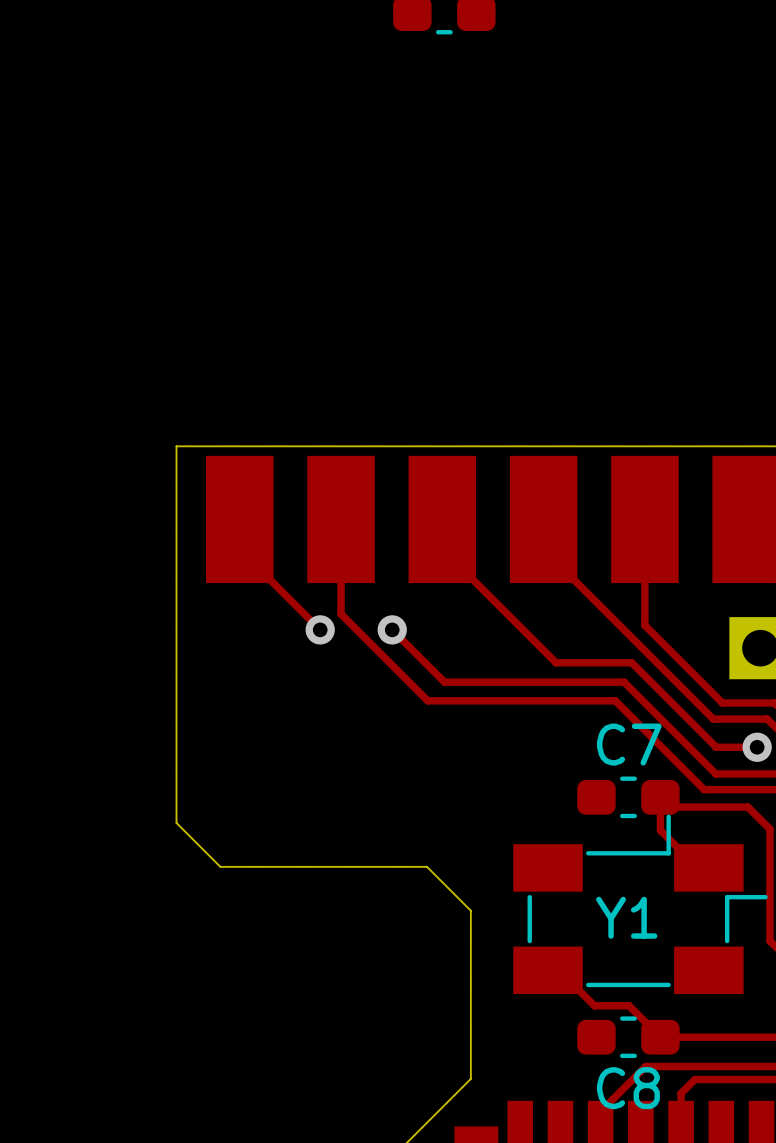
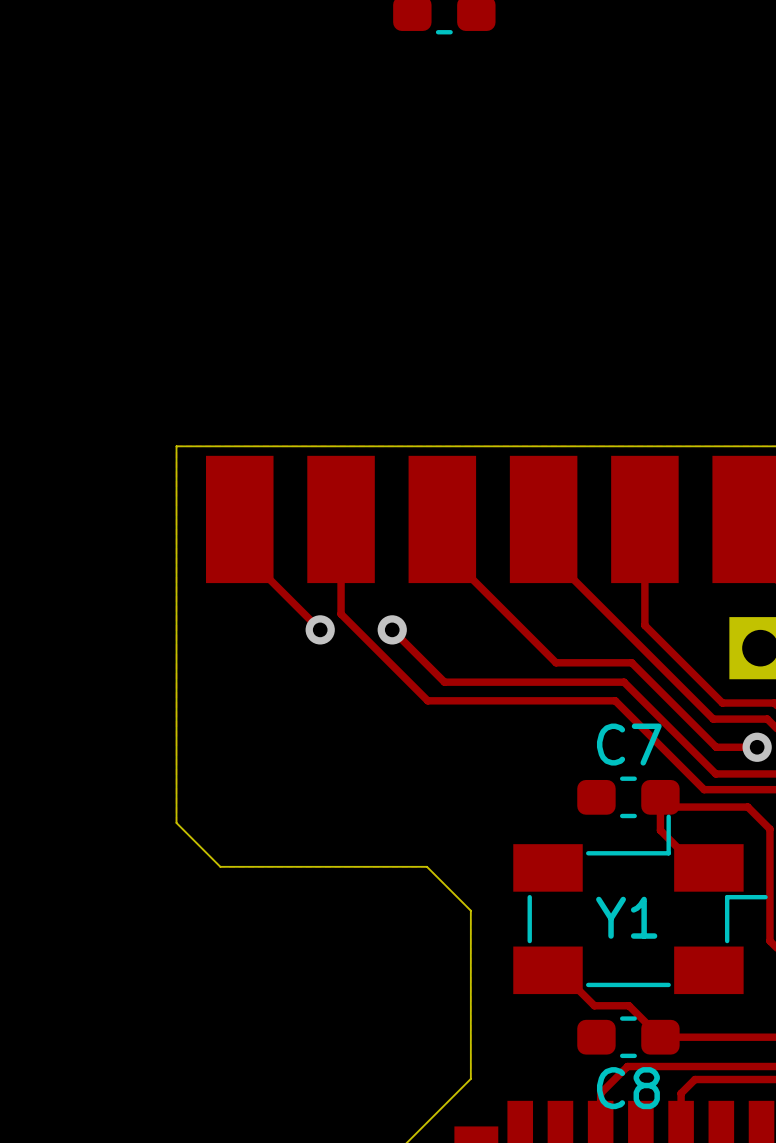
track: (645, 1066) (600, 1111) -> (645, 1066) (627, 1066) (600, 1093) (600, 1111)

